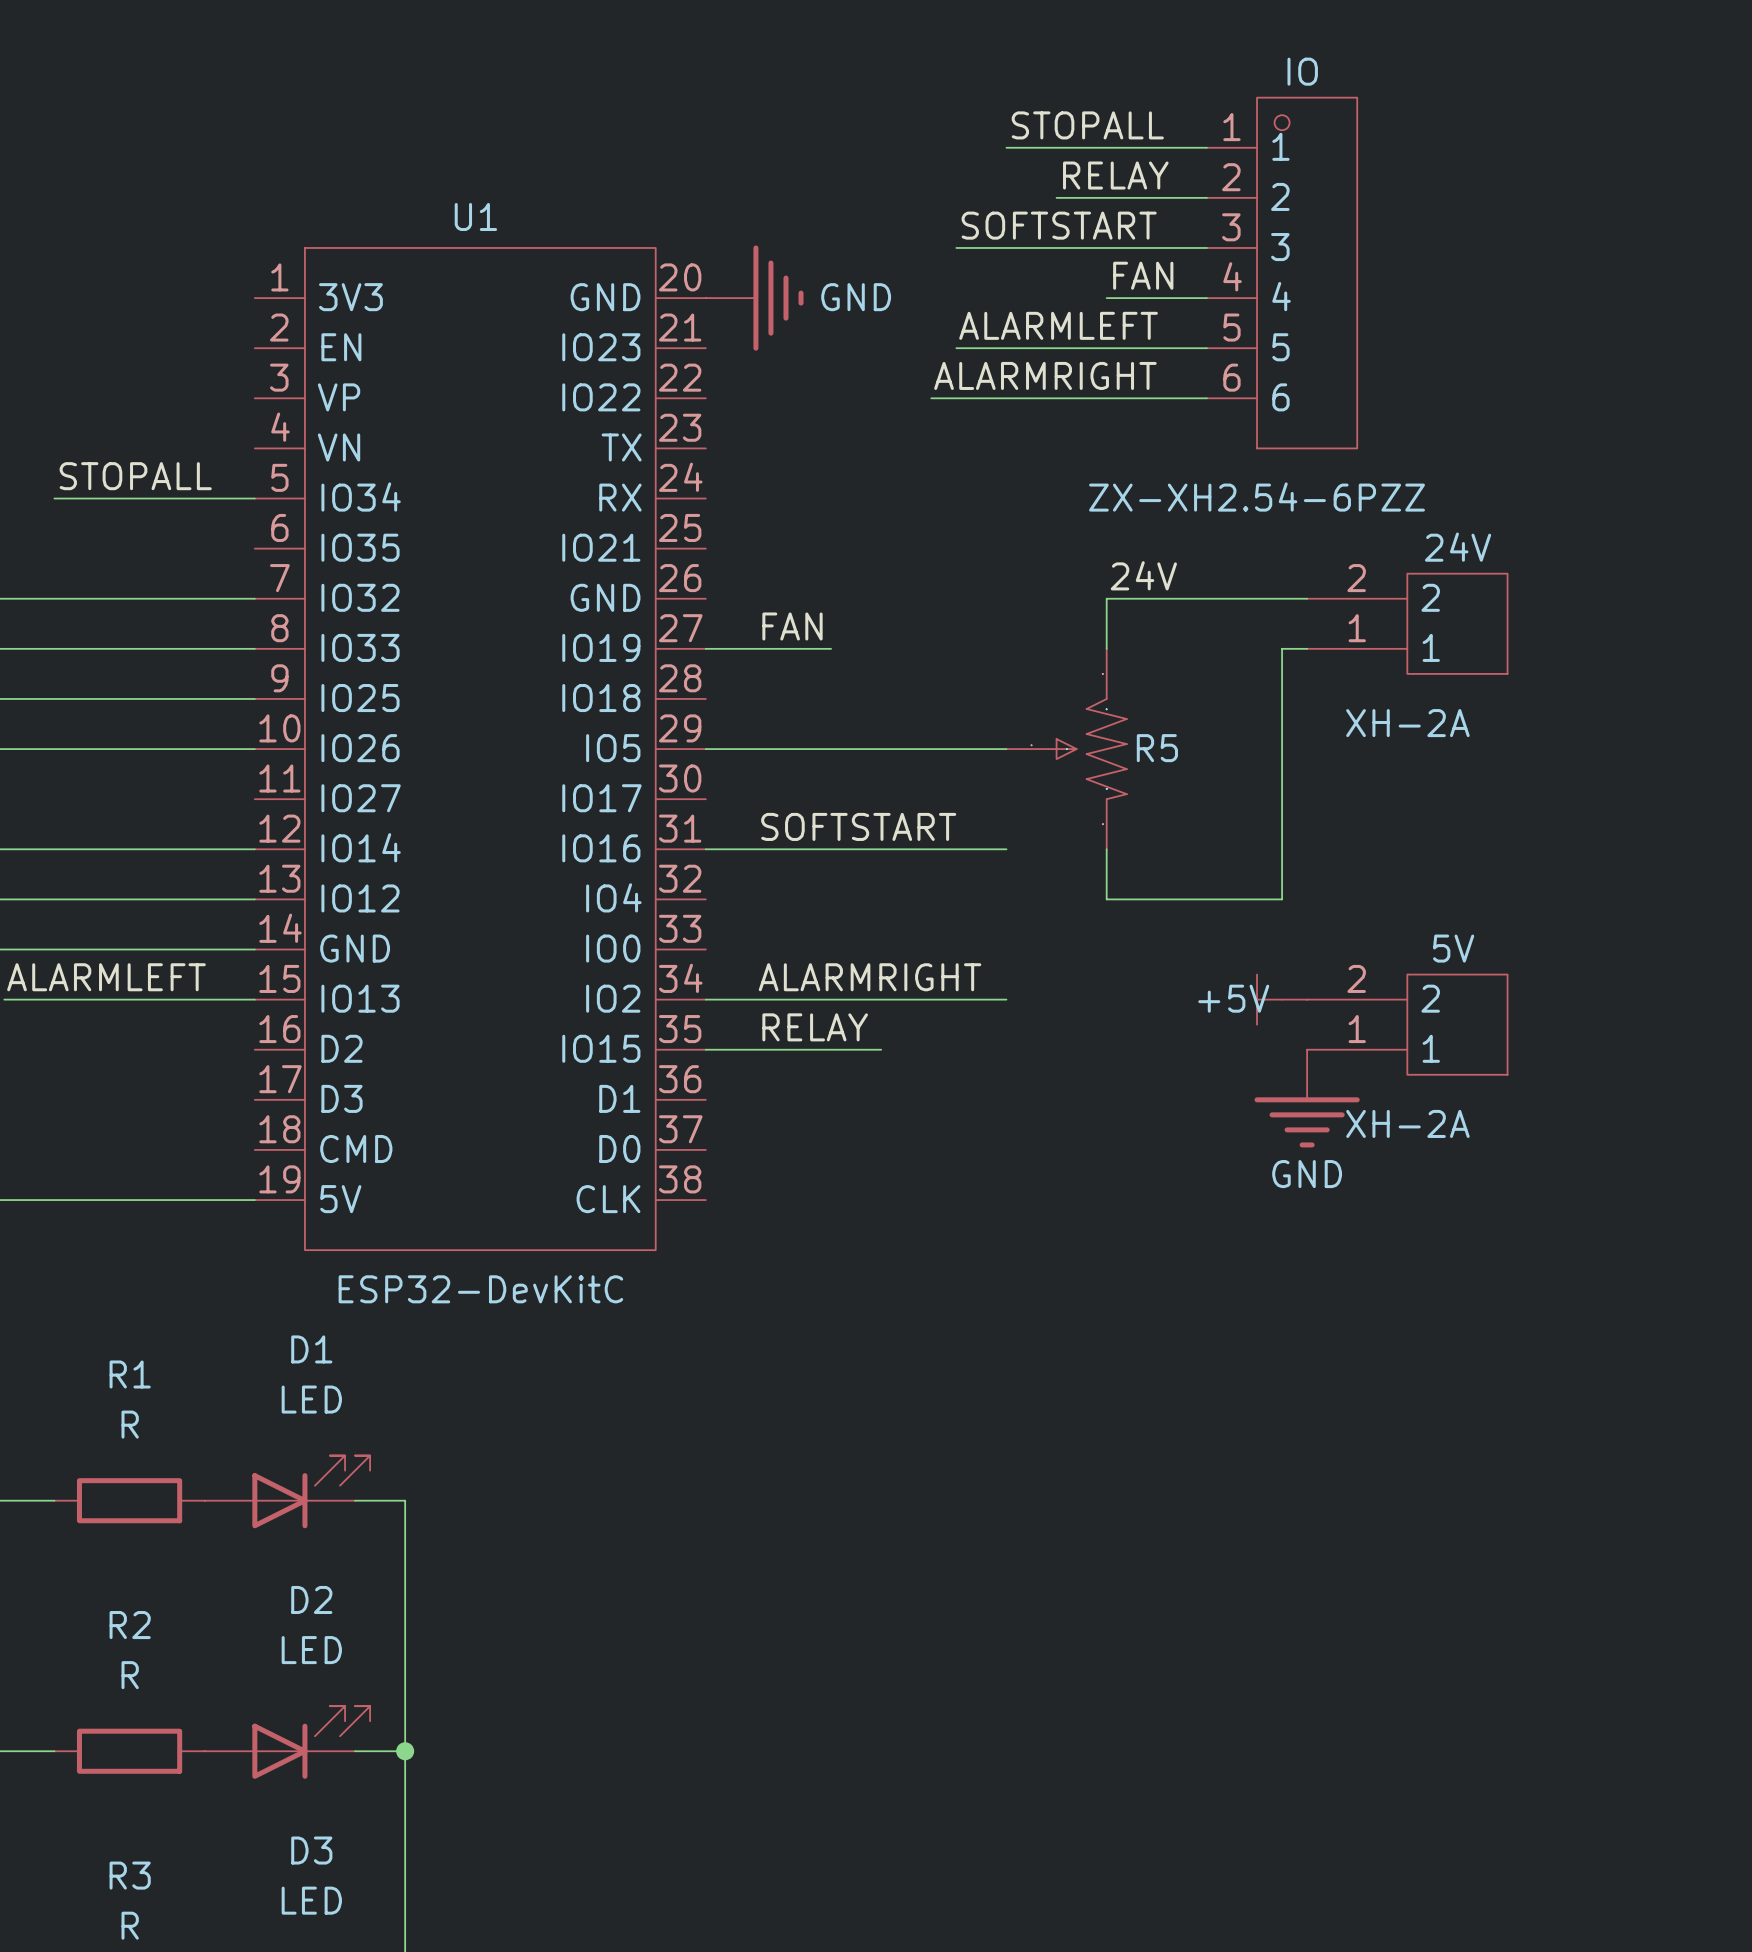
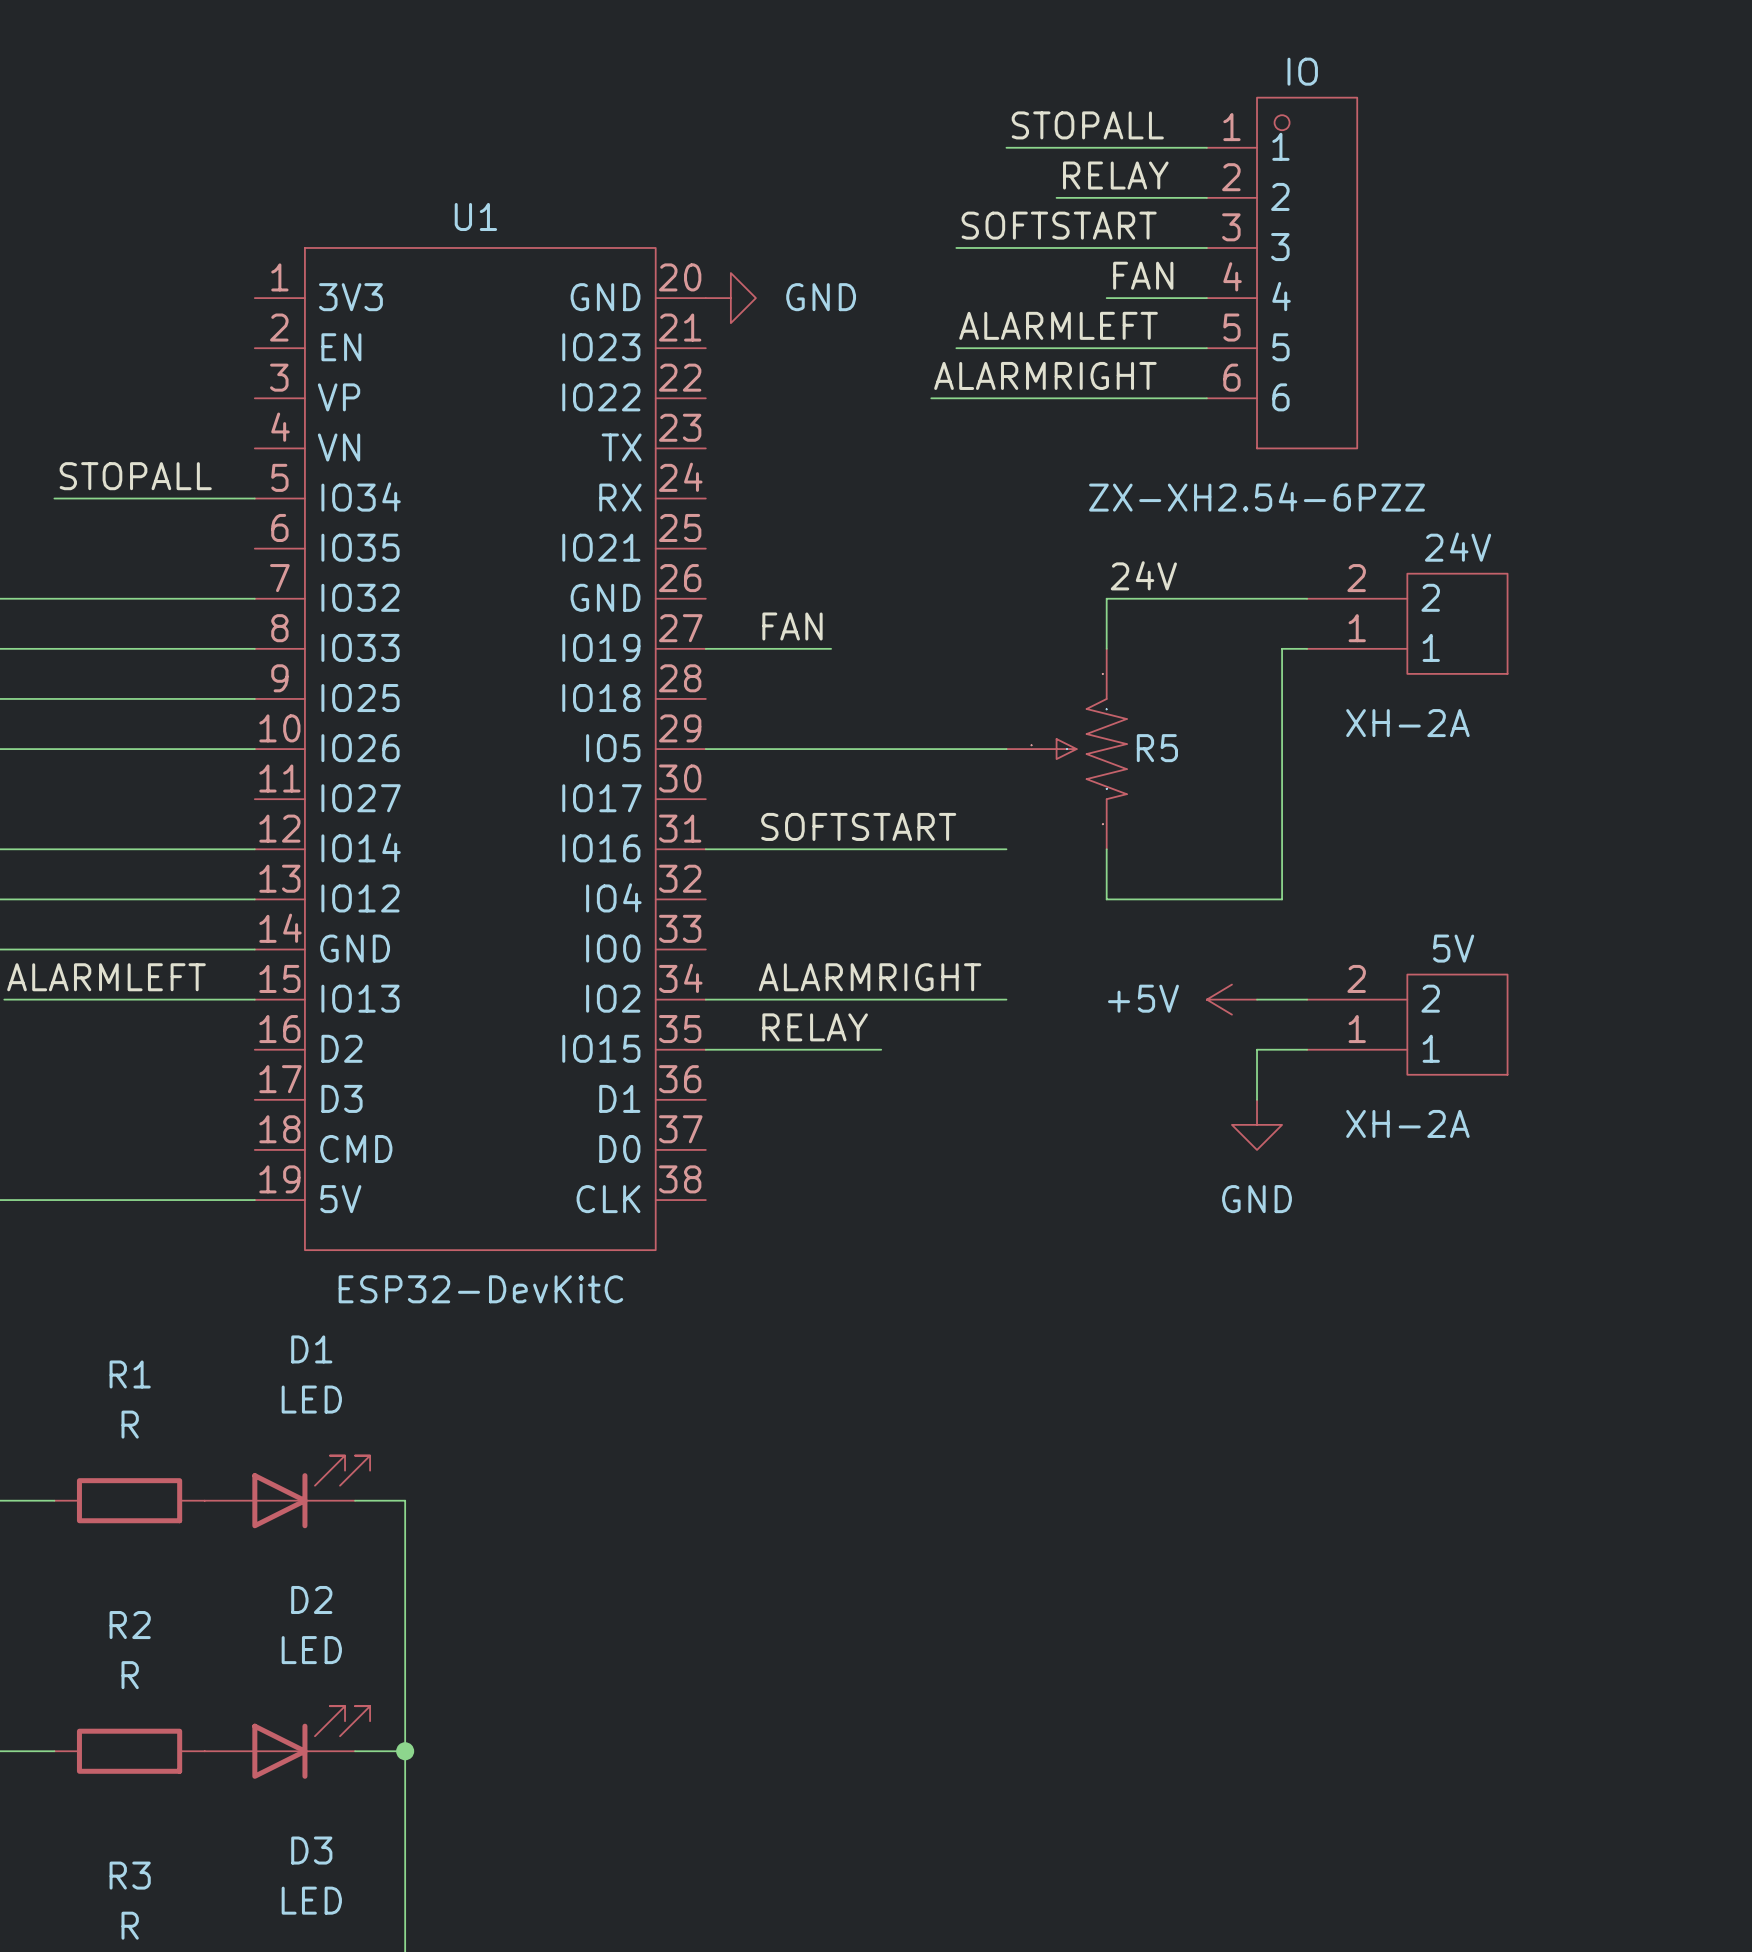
power symbol: none -> GND (730, 298)
power symbol: GND (754, 298) -> none
power symbol: none -> +5V (1231, 999)
power symbol: +5V (1282, 999) -> none
wire: none -> (1307, 1049) (1257, 1049) (1257, 1099)
power symbol: GND (1307, 1098) -> none
power symbol: none -> GND (1257, 1124)

